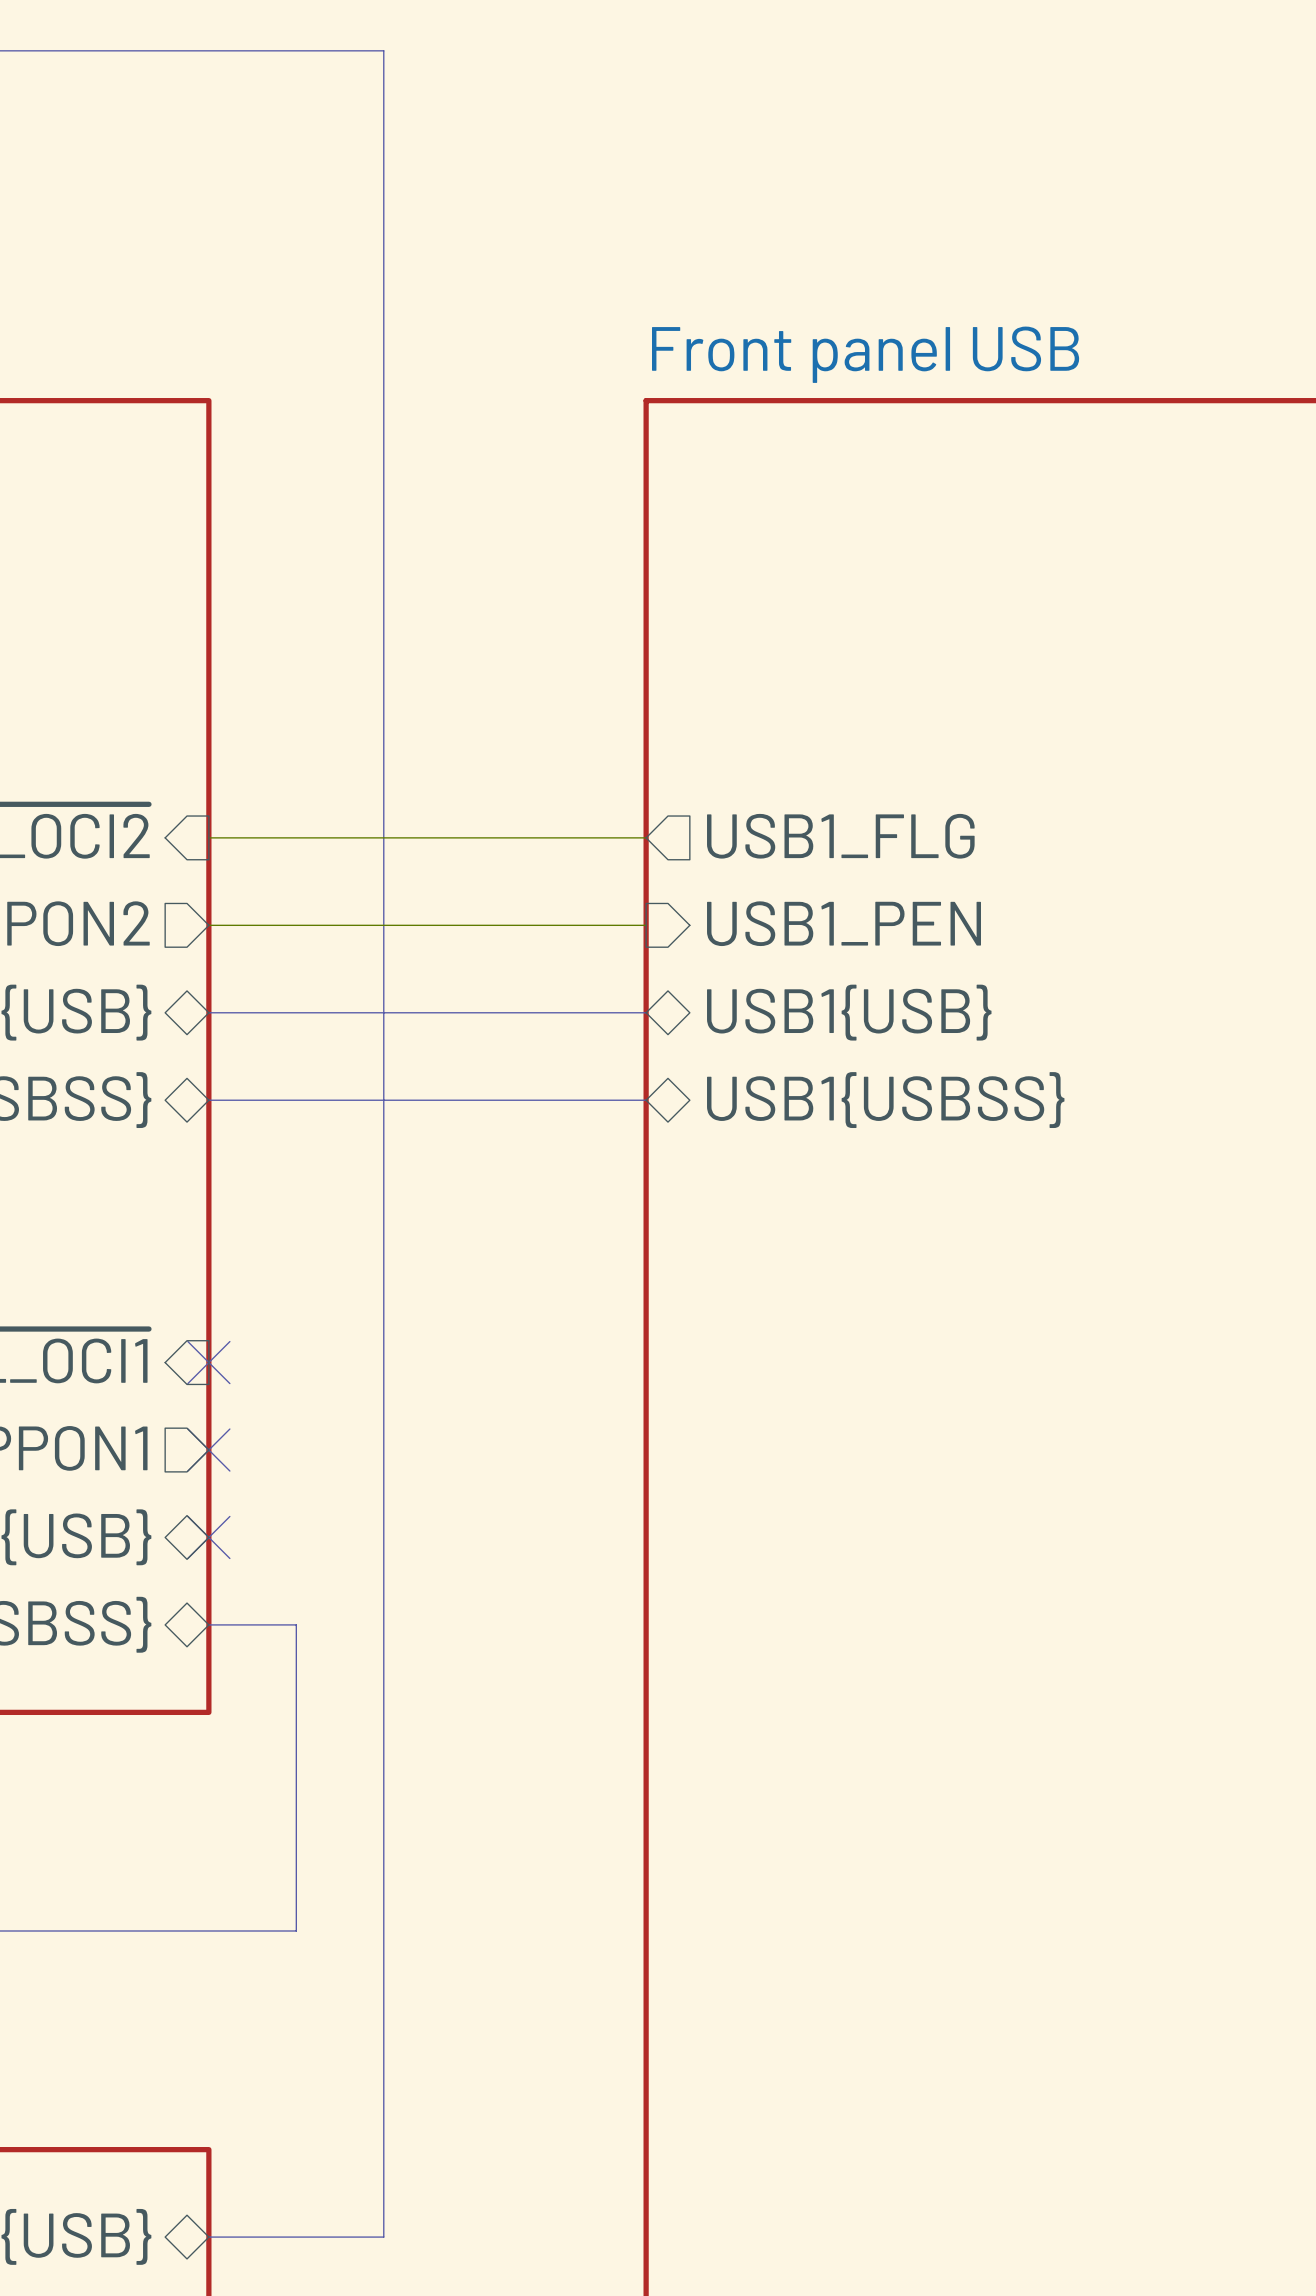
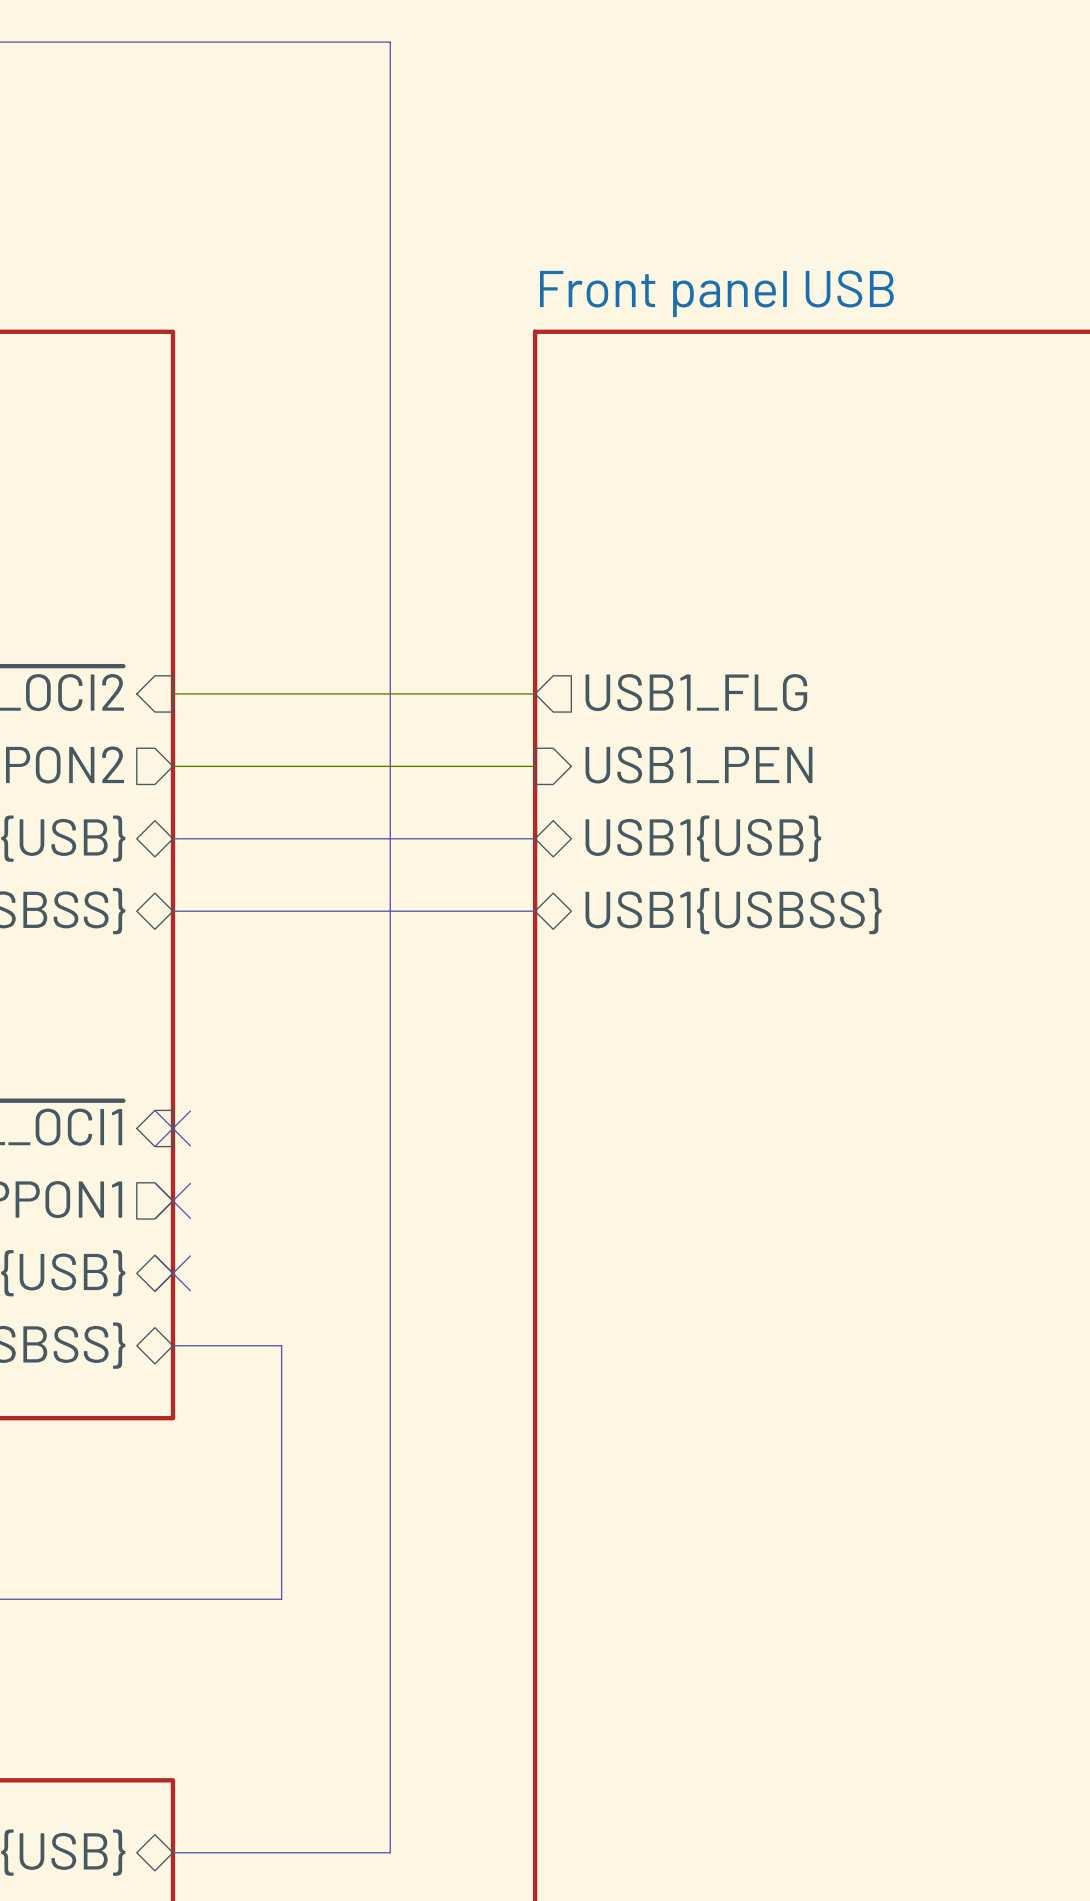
bus: (383, 50) (383, 2237) -> (317, 42) (390, 42) (390, 1852) (317, 1852)
bus: (296, 1624) (296, 1931) -> (245, 1345) (281, 1345) (281, 1599) (245, 1599)

